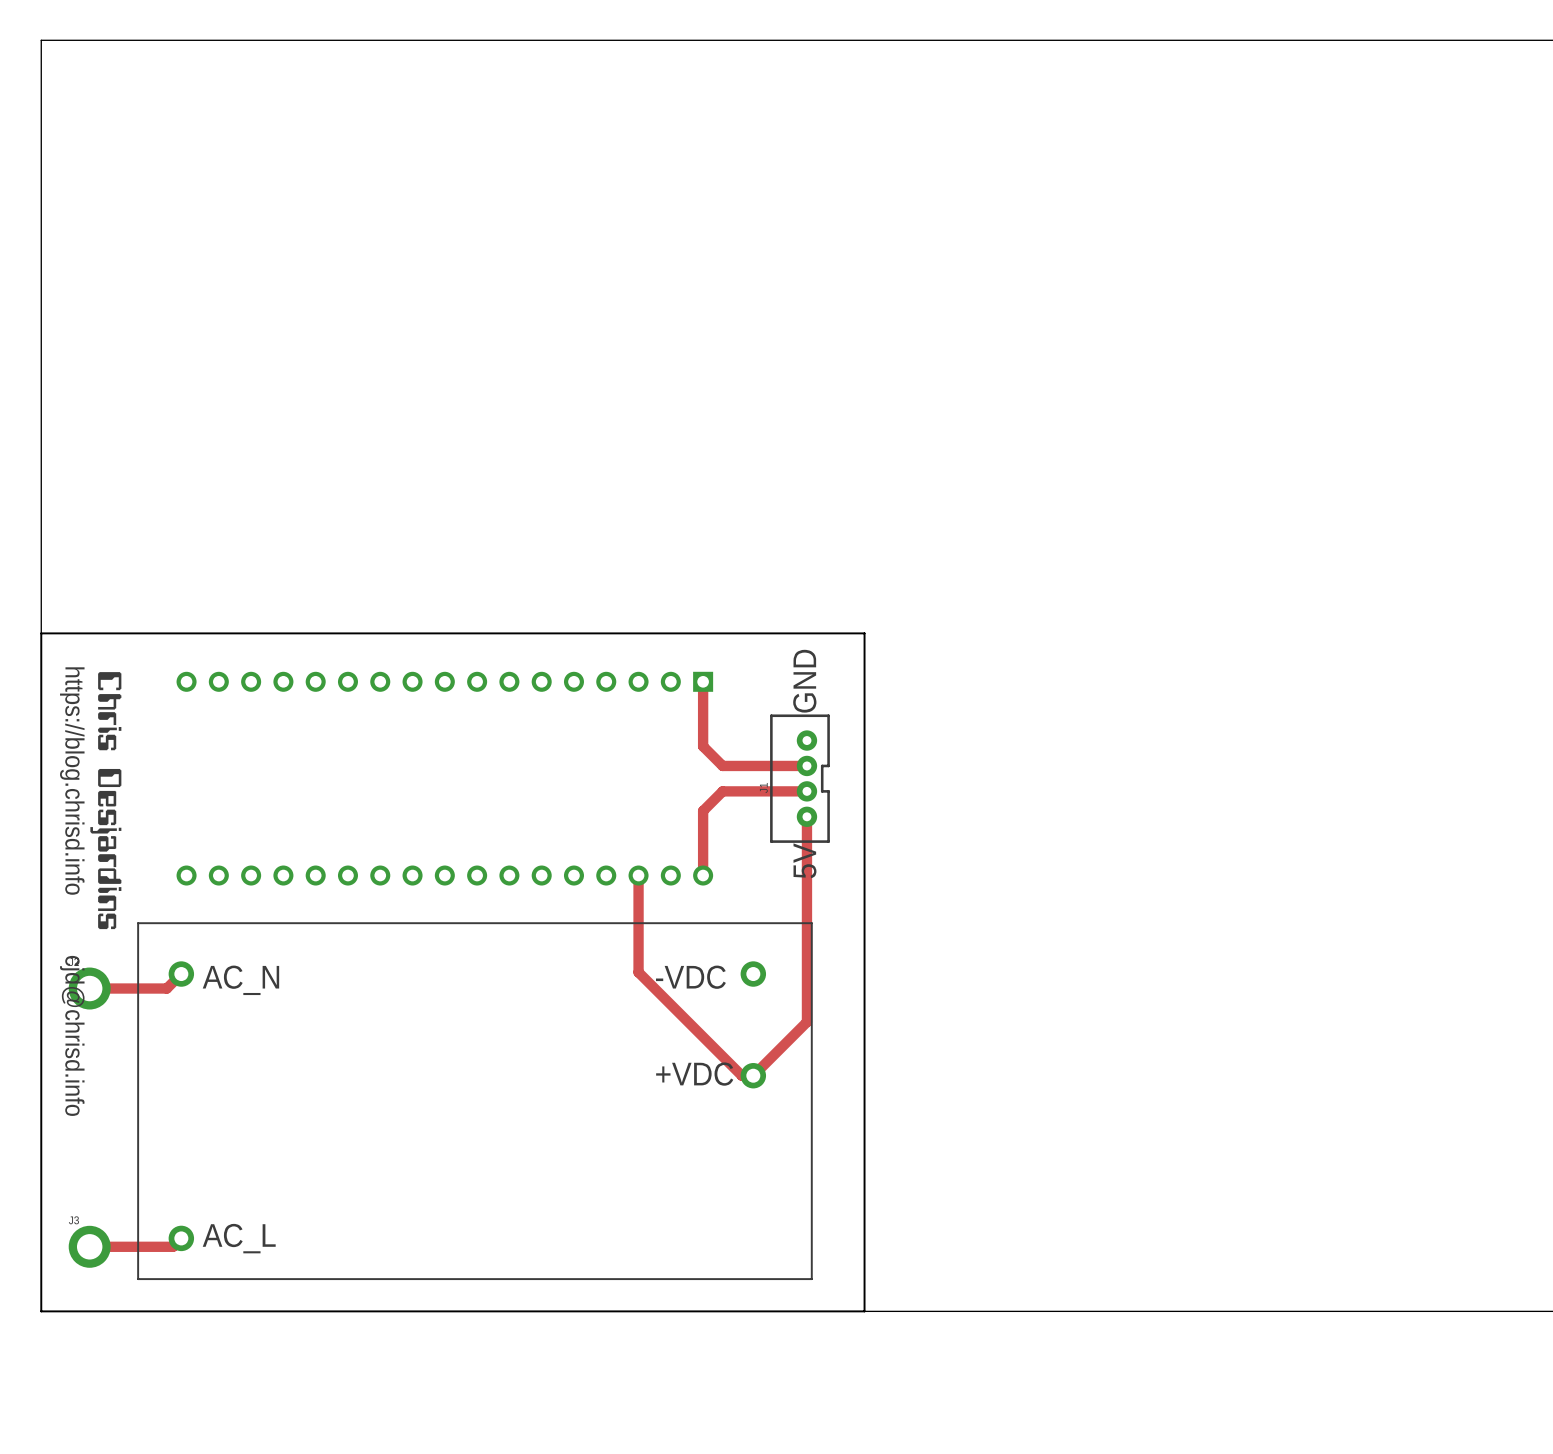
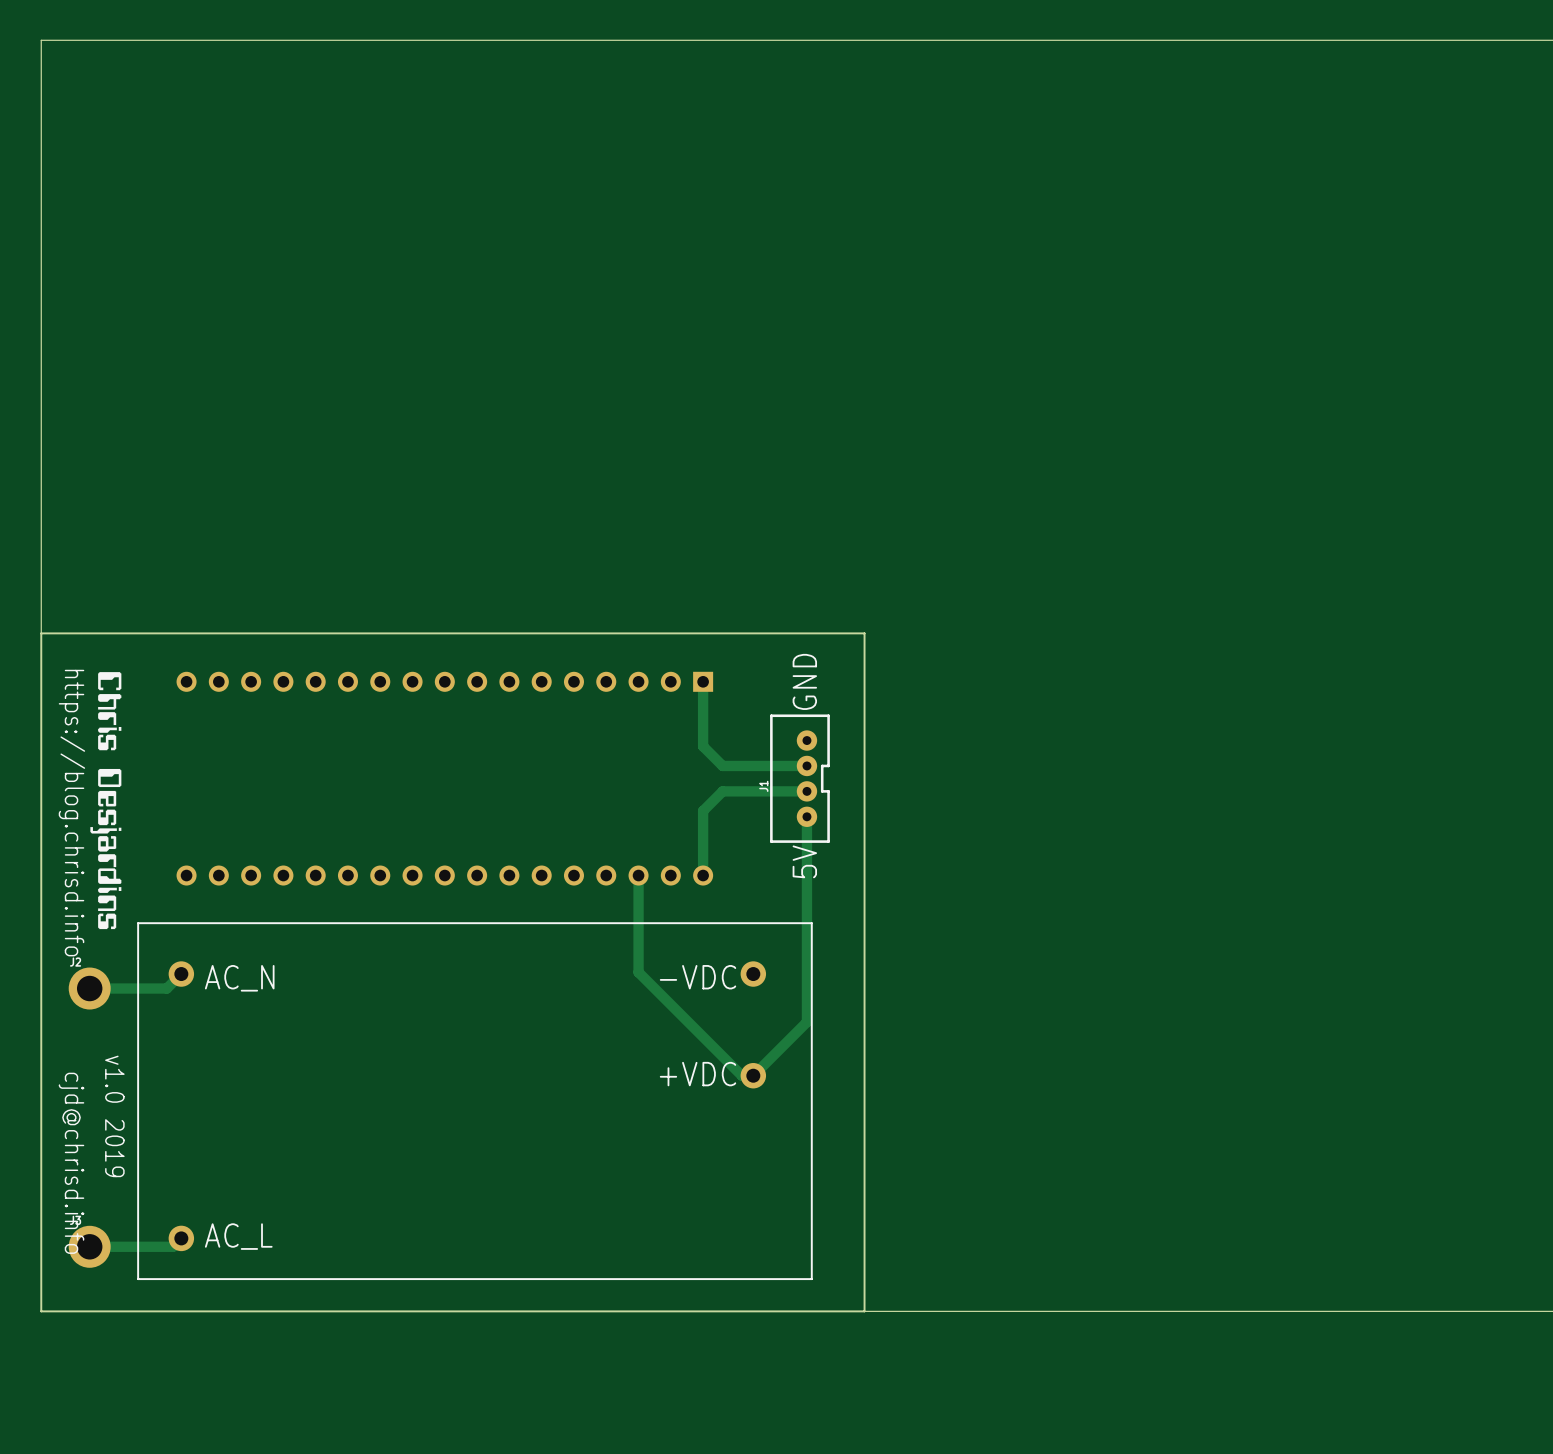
text: none -> v1.0 2019 (114, 1116)

